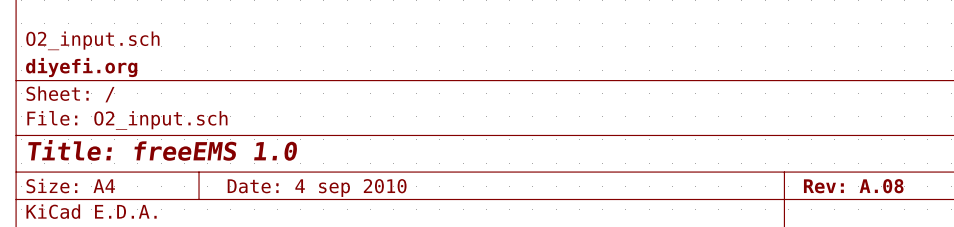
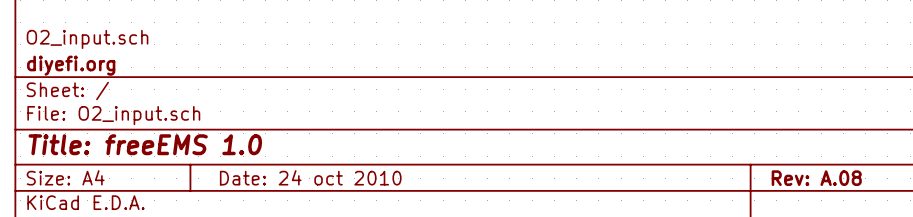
title block: Date: 4 sep 2010 (317, 188) -> Date: 24 oct 2010 (310, 177)

